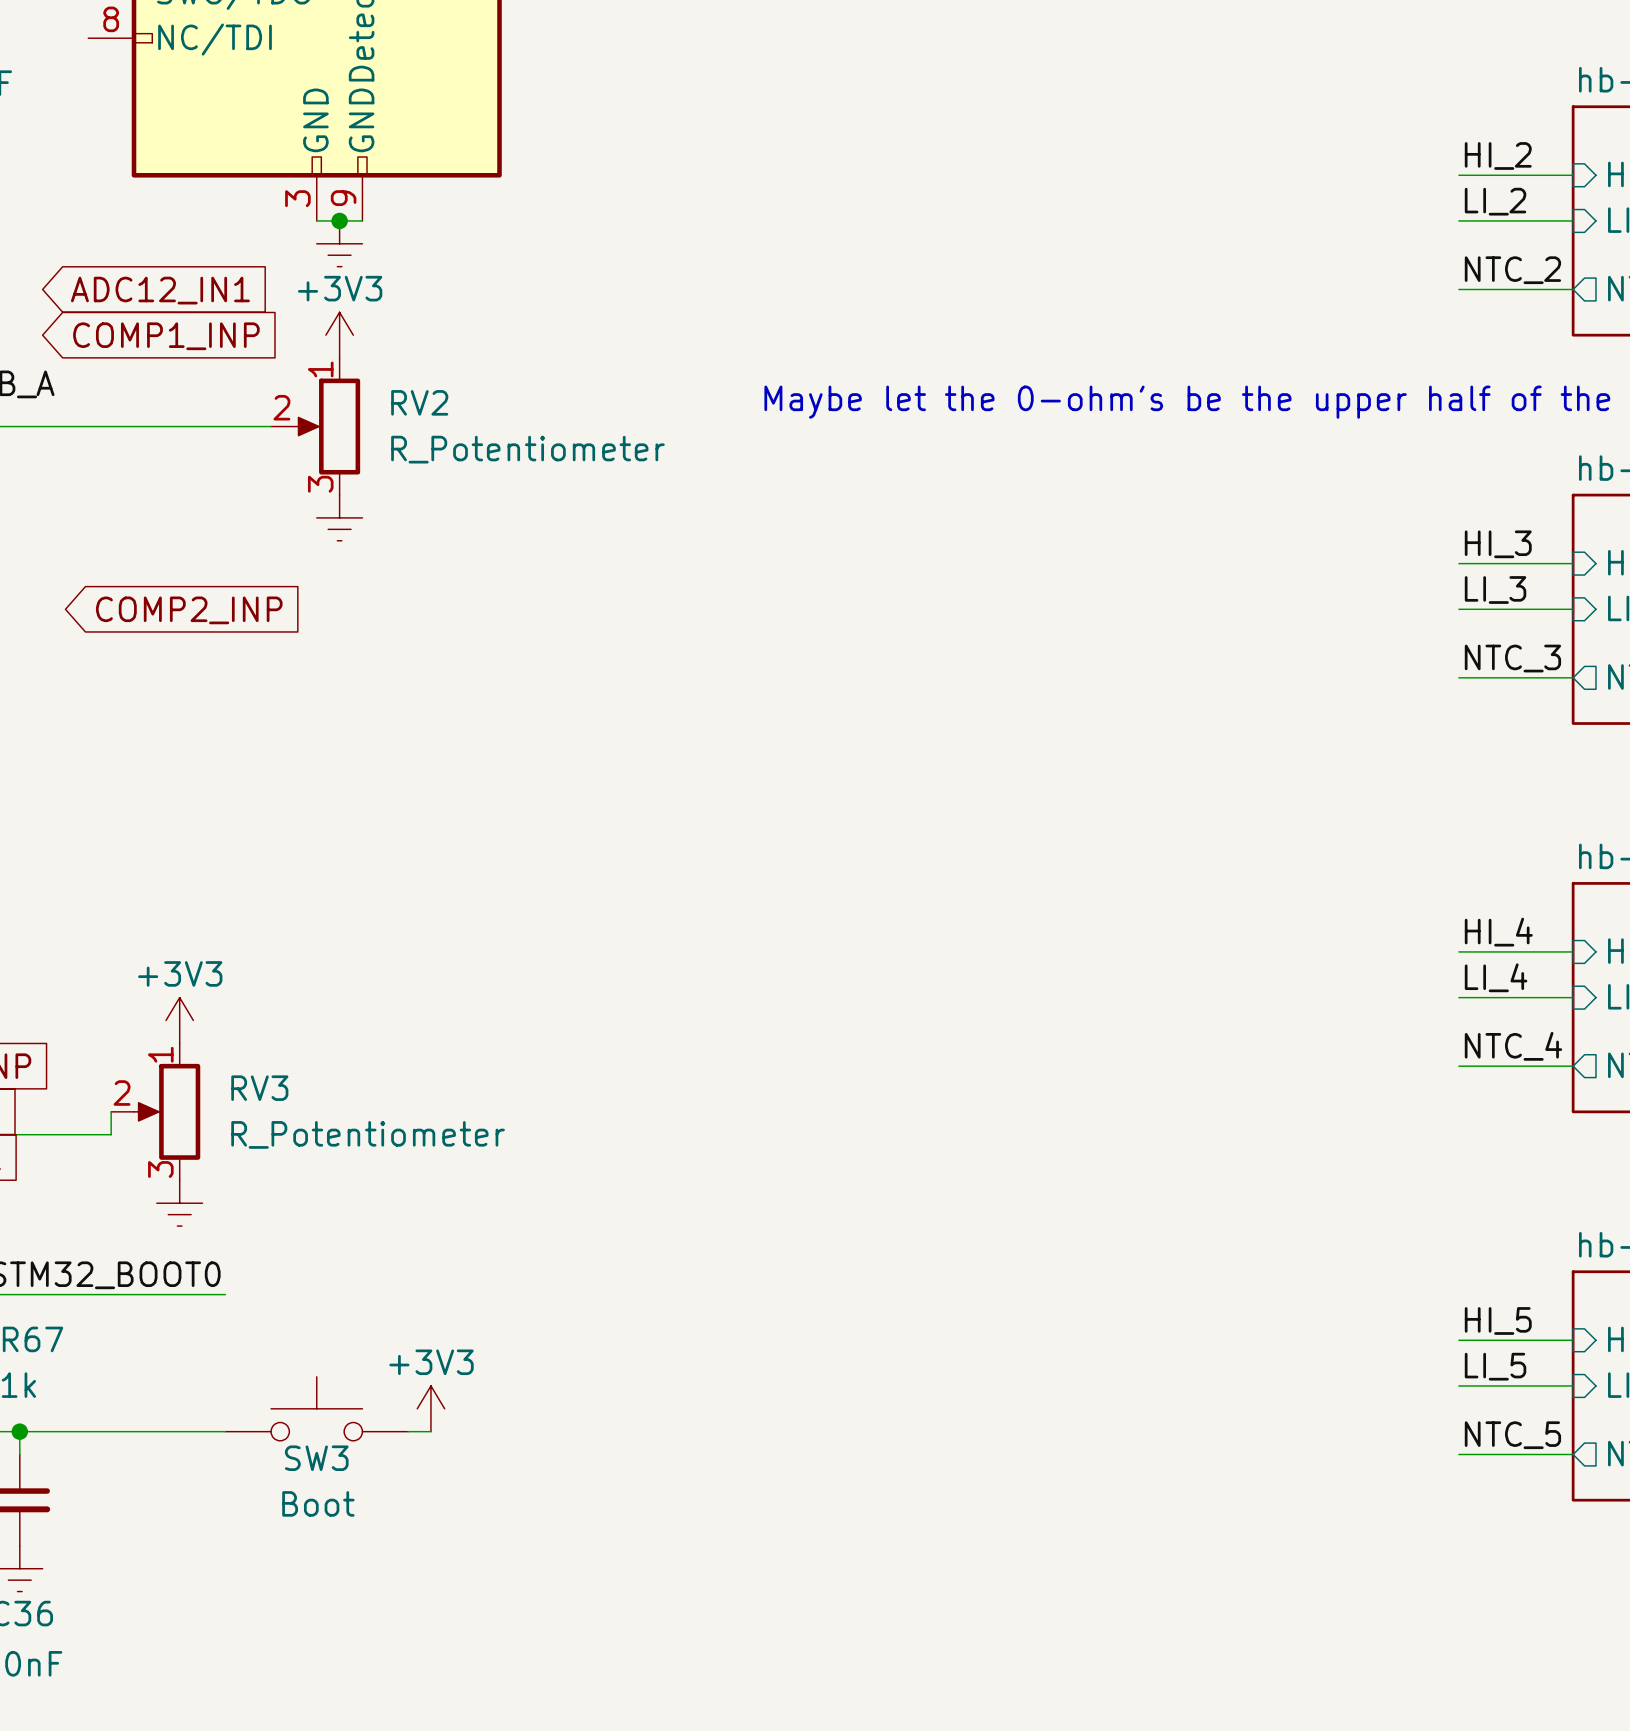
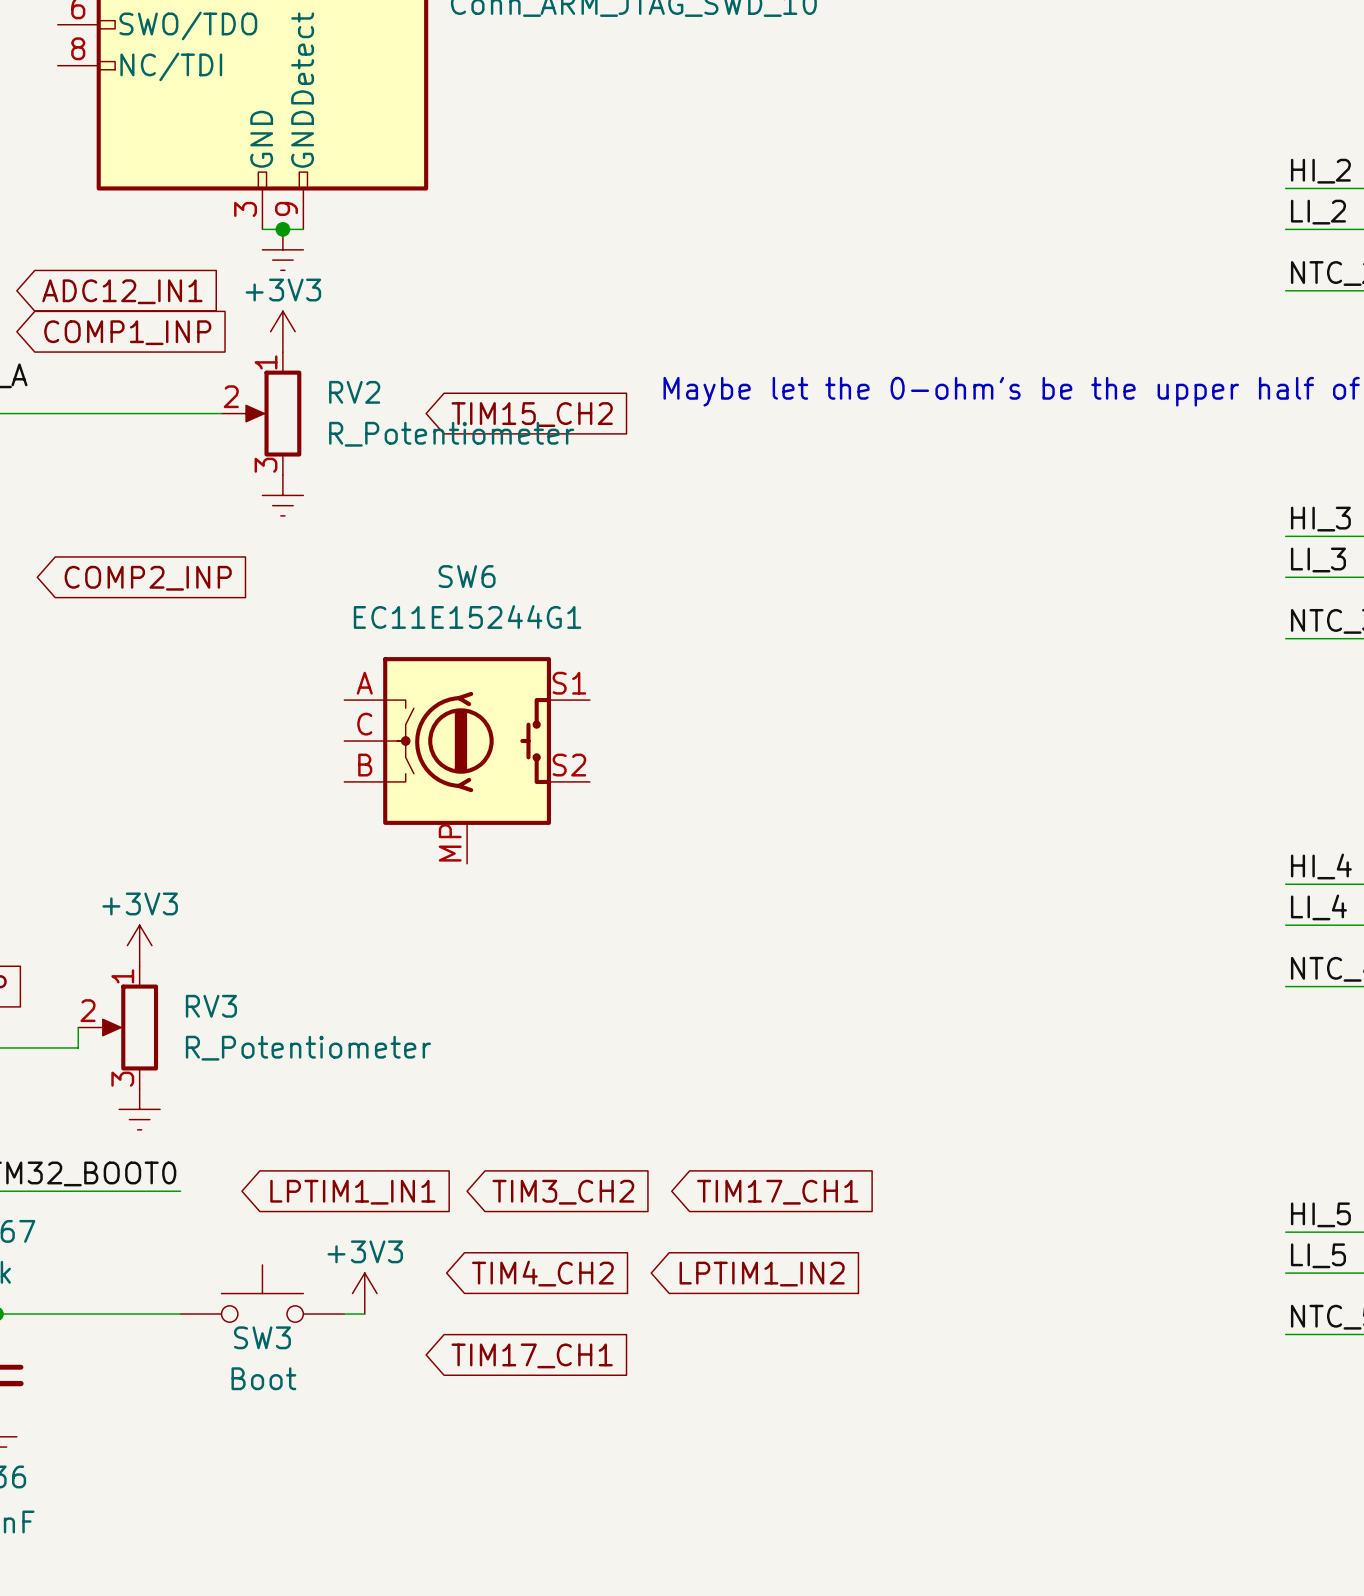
global label: none -> TIM15_CH2 (532, 414)
SW6: none -> EC11E15244G1 (467, 760)
global label: none -> LPTIM1_IN1 (352, 1192)
global label: none -> TIM3_CH2 (563, 1192)
global label: none -> TIM17_CH1 (777, 1192)
global label: none -> TIM4_CH2 (542, 1273)
global label: none -> LPTIM1_IN2 (762, 1274)
global label: none -> TIM17_CH1 (532, 1355)

